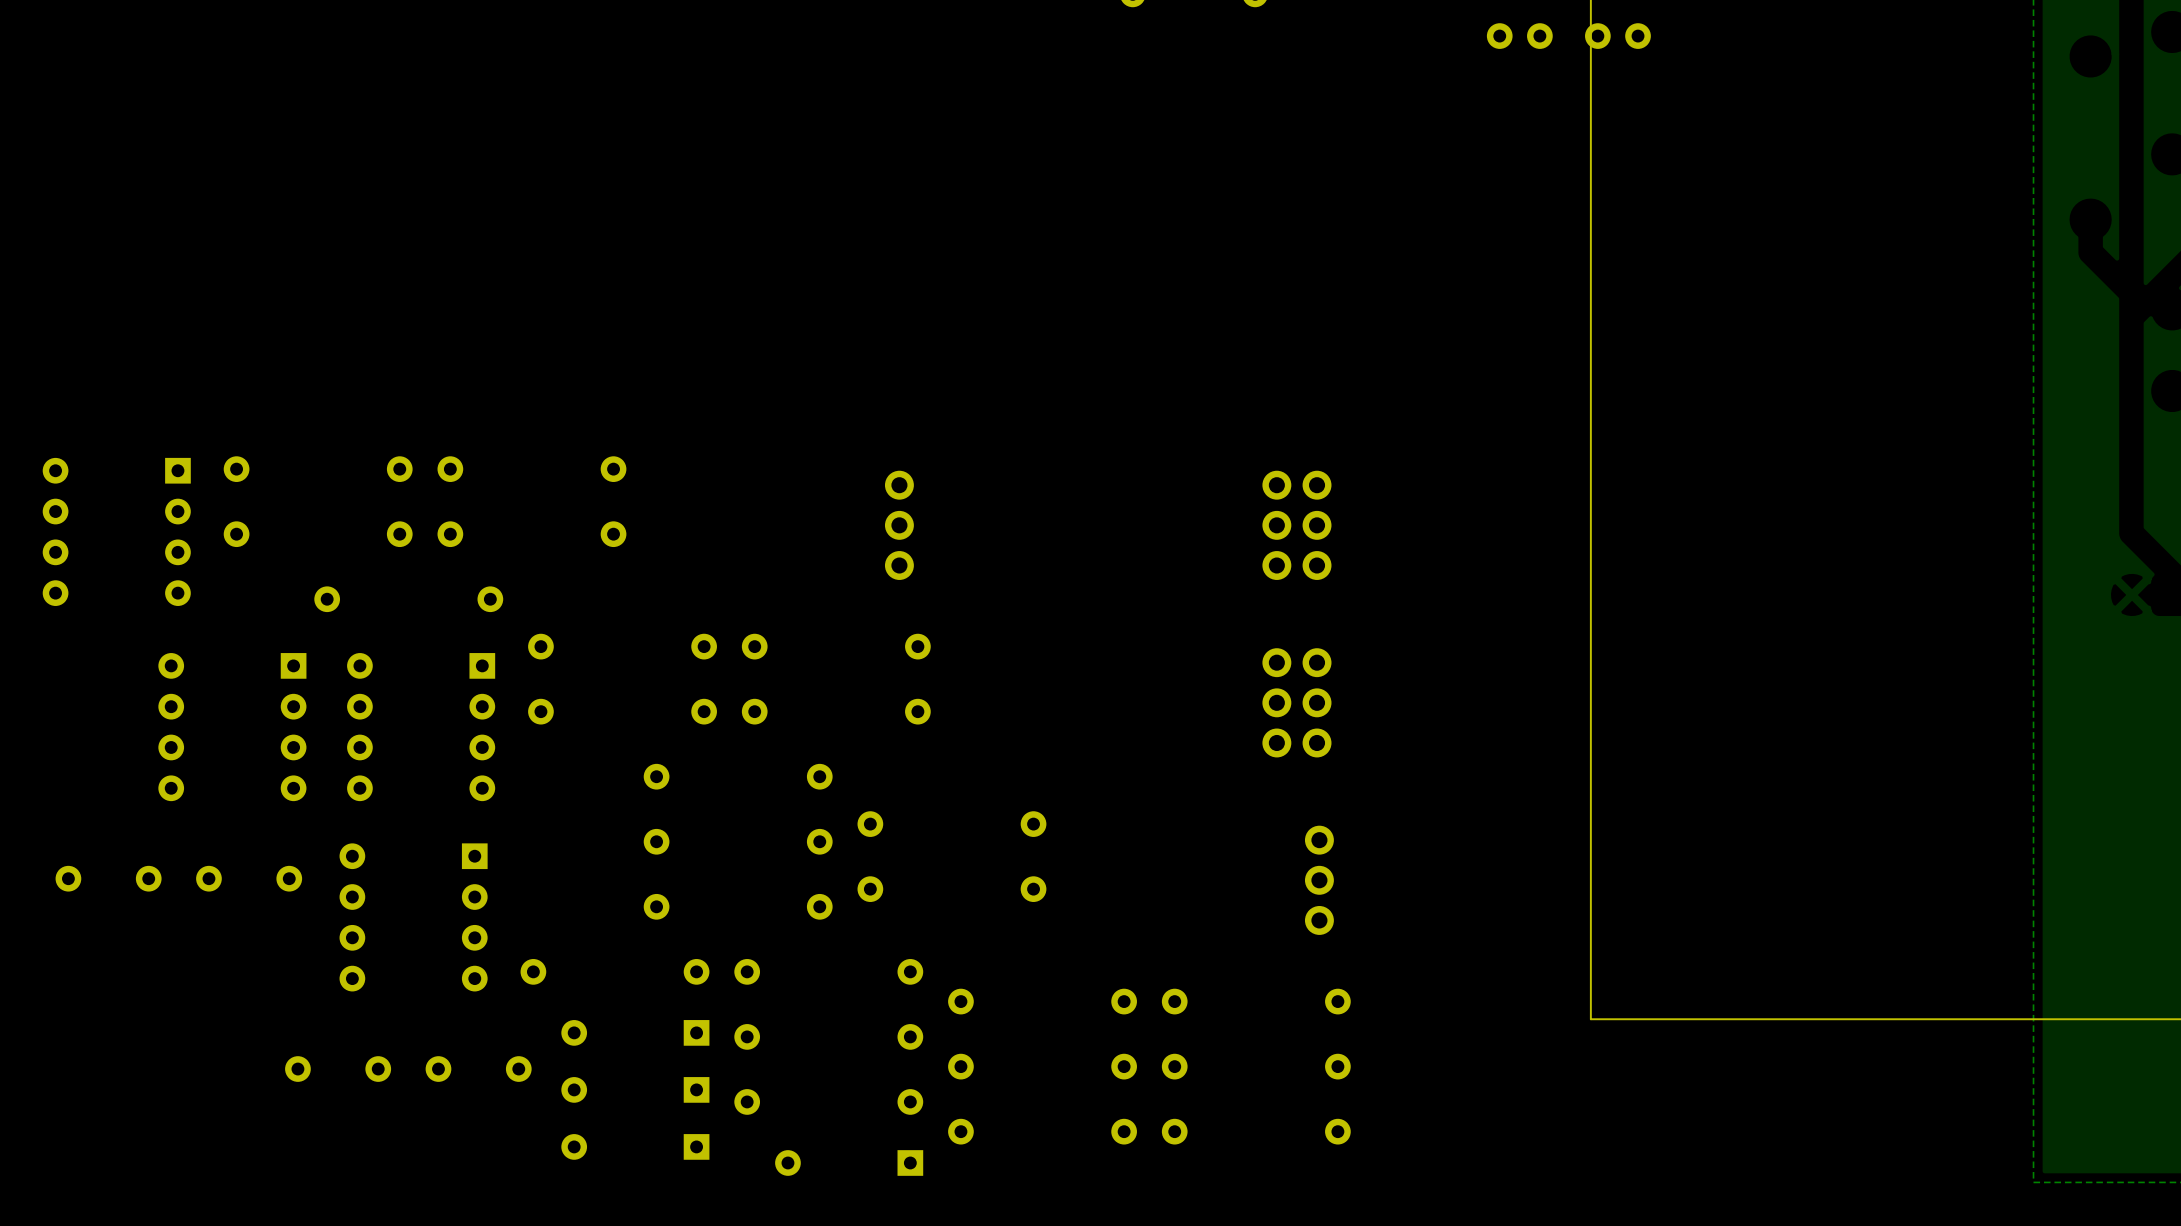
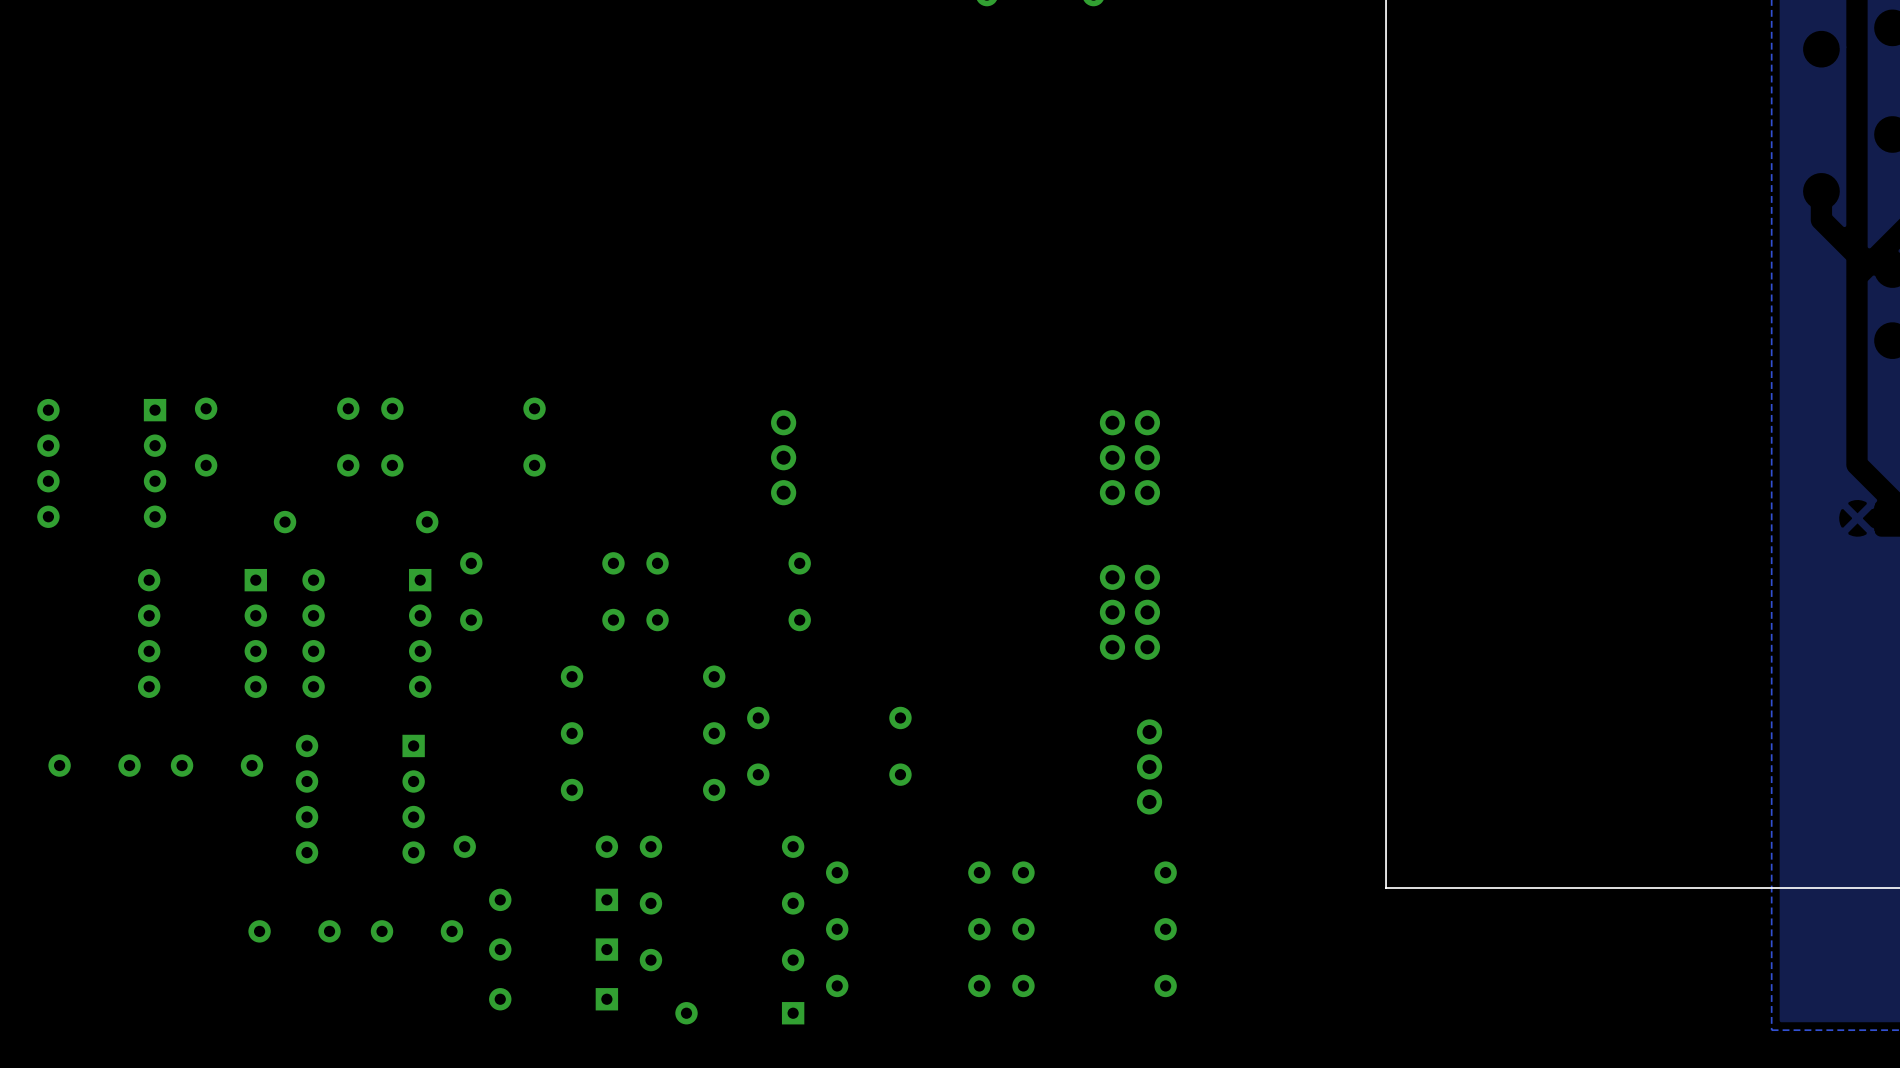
part: (1519, 36) -> none
part: (1617, 36) -> none

